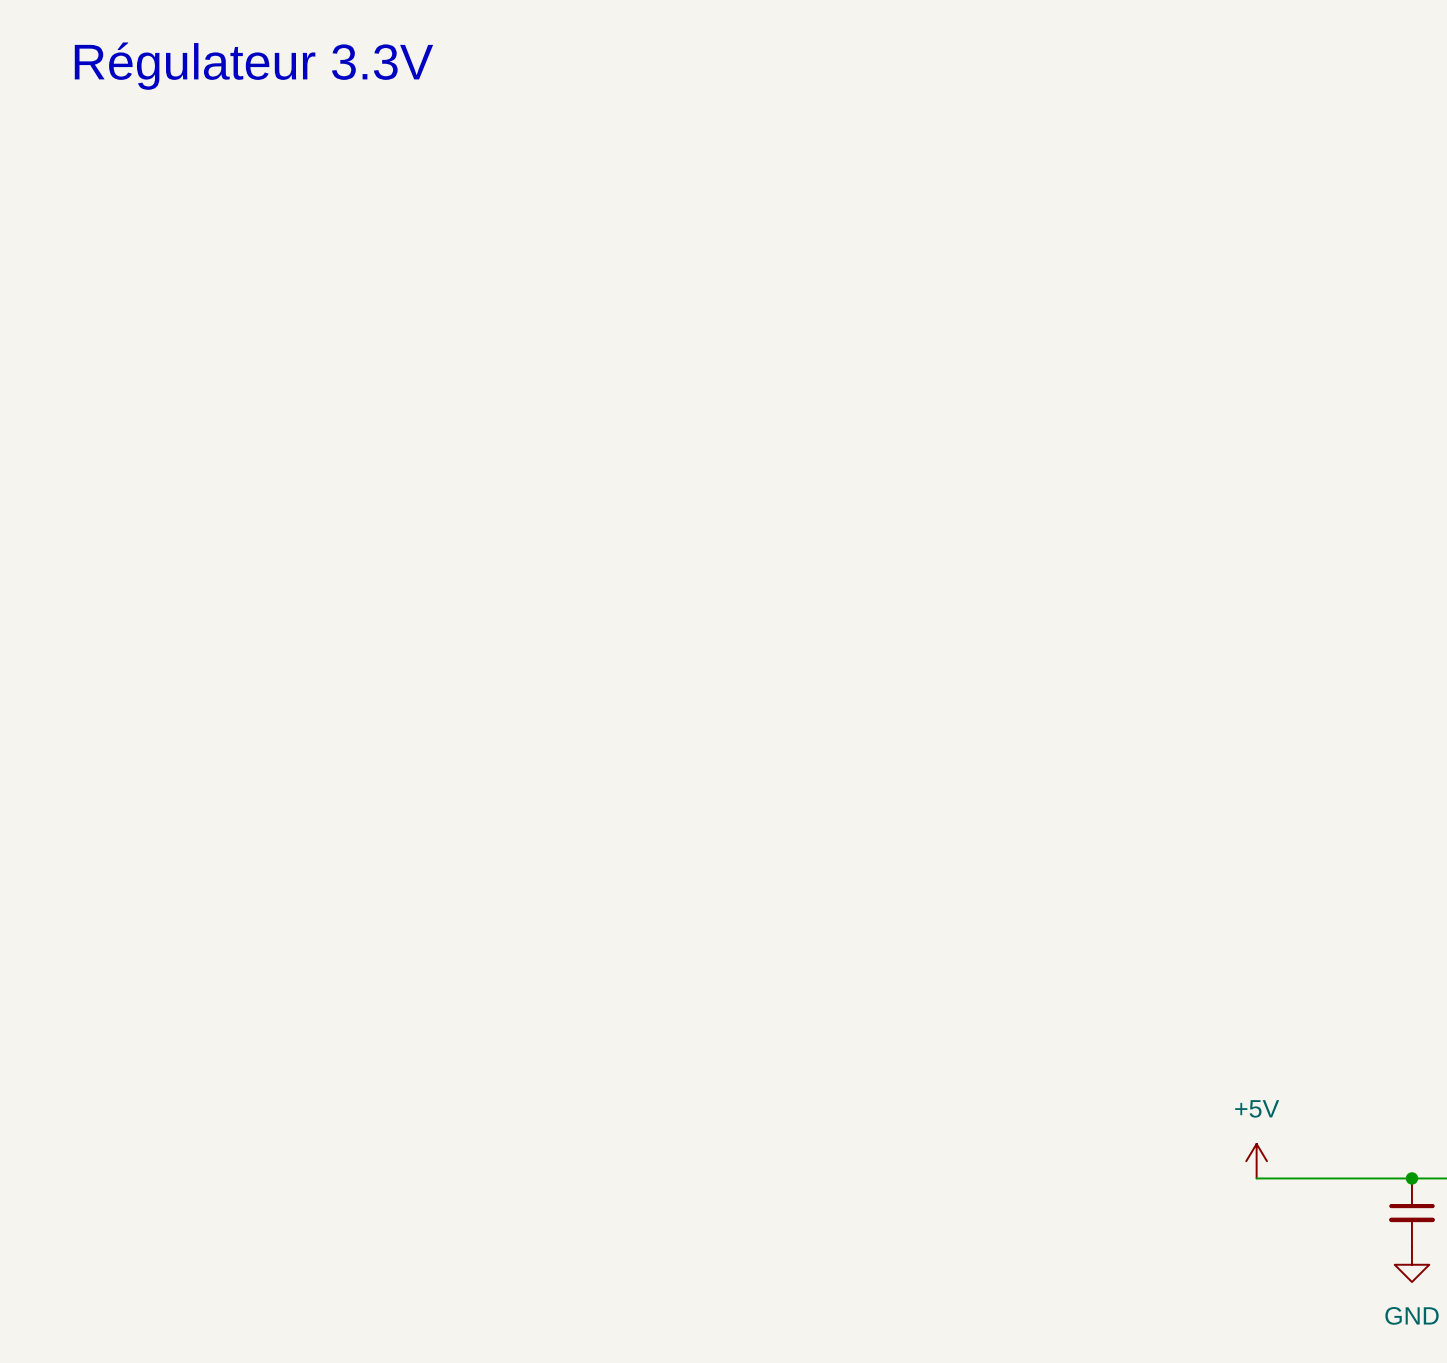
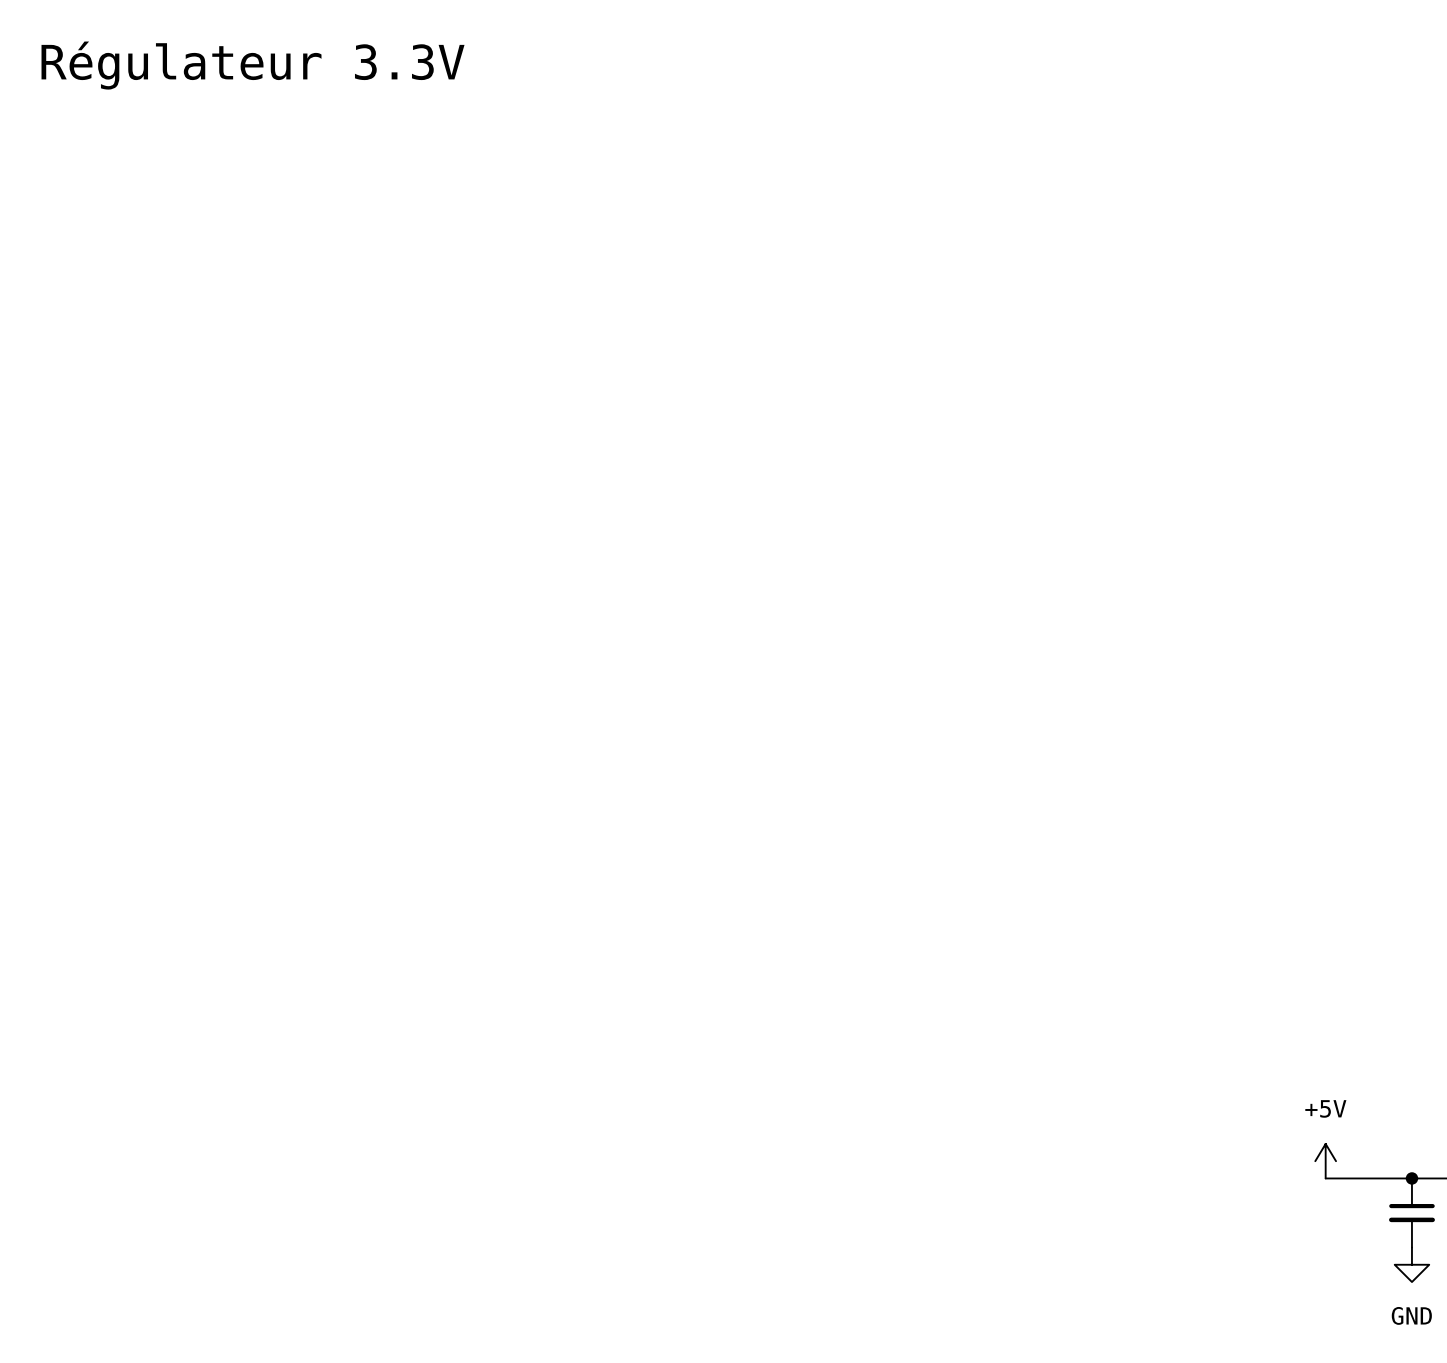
power symbol position: +5V (1256, 1161) -> +5V (1325, 1161)
wire: (1256, 1178) (1325, 1178) -> none

